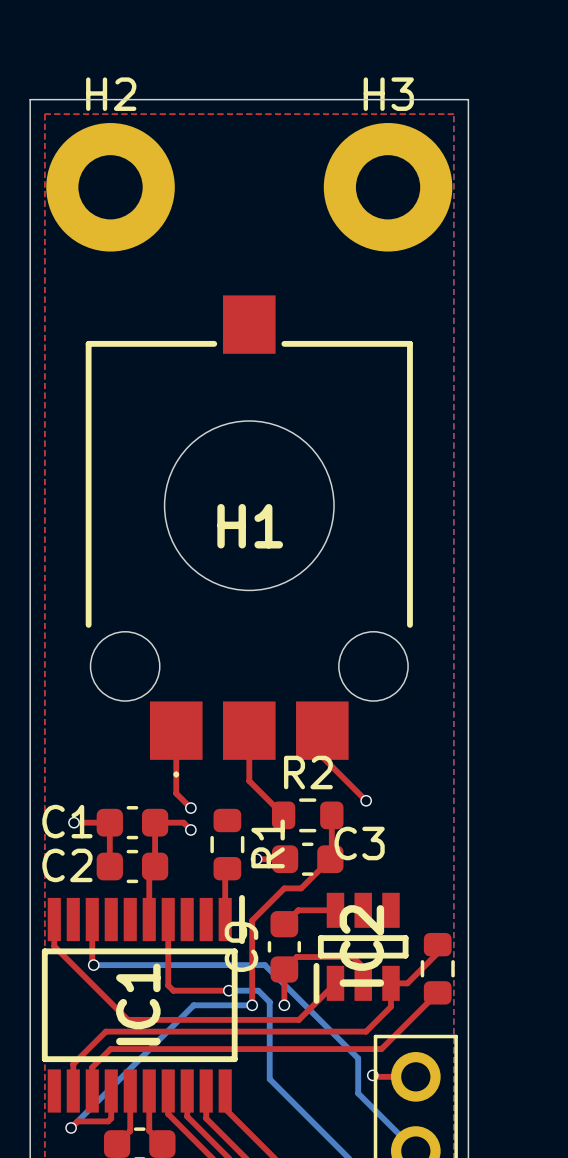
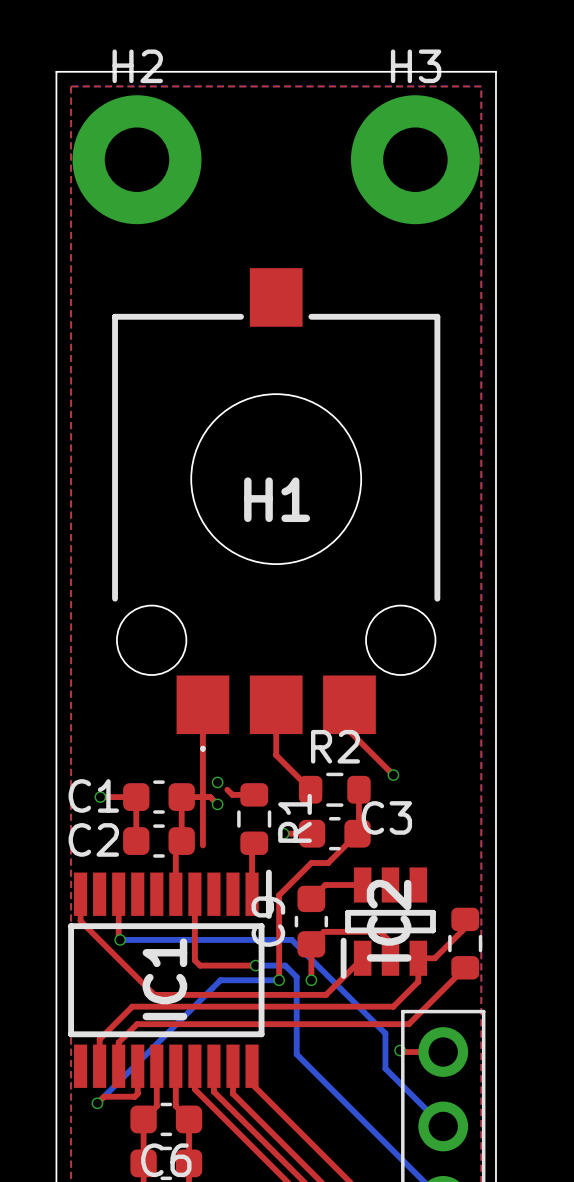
top track: (176, 793) (190, 808) -> (202, 767) (202, 845)
top track: none -> (227, 789) (232, 794) (254, 794)

